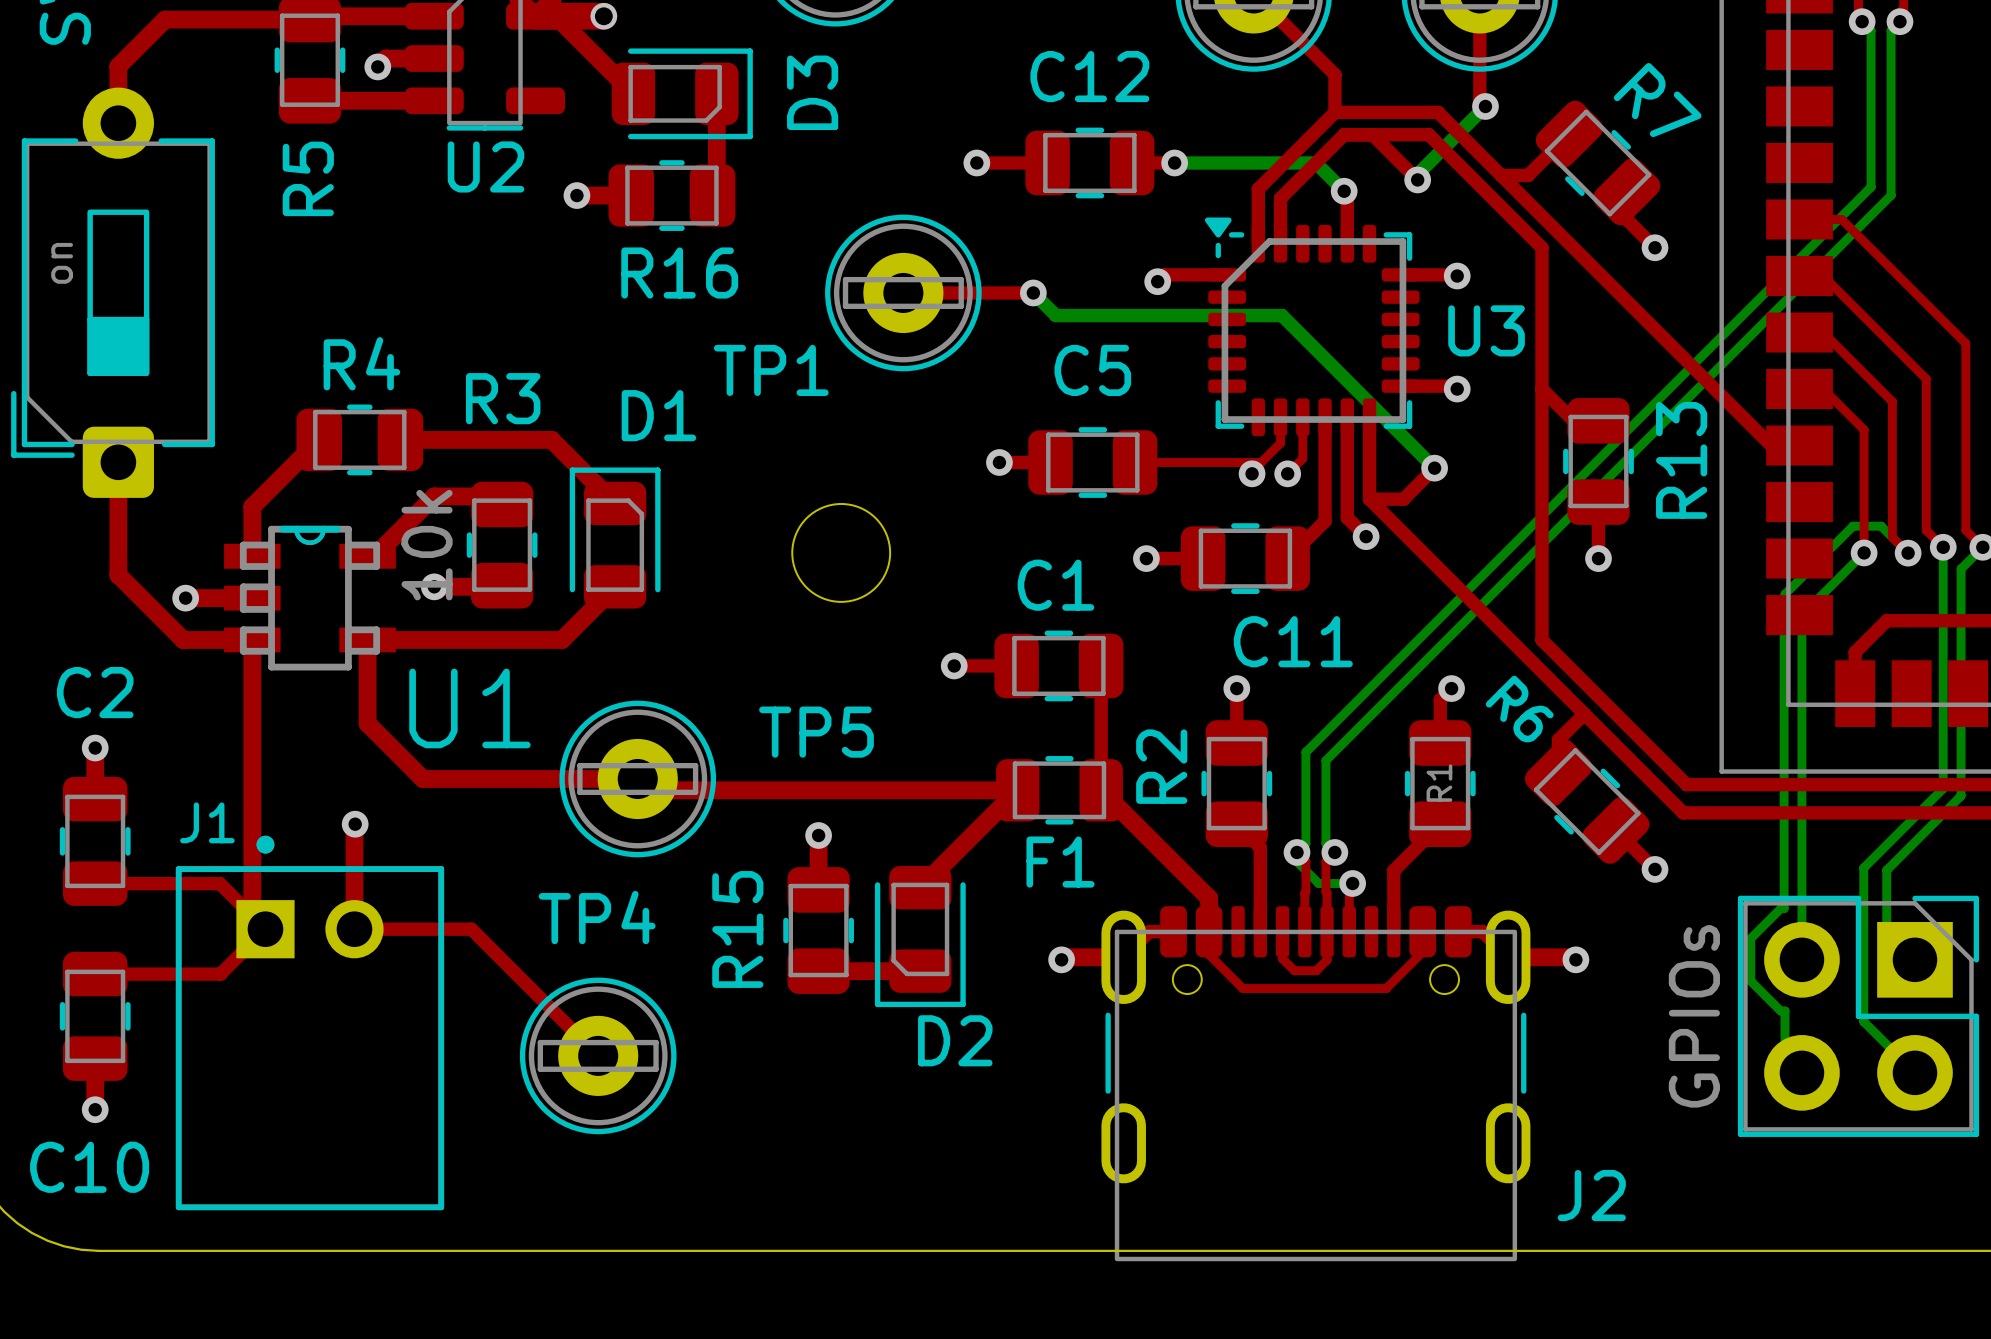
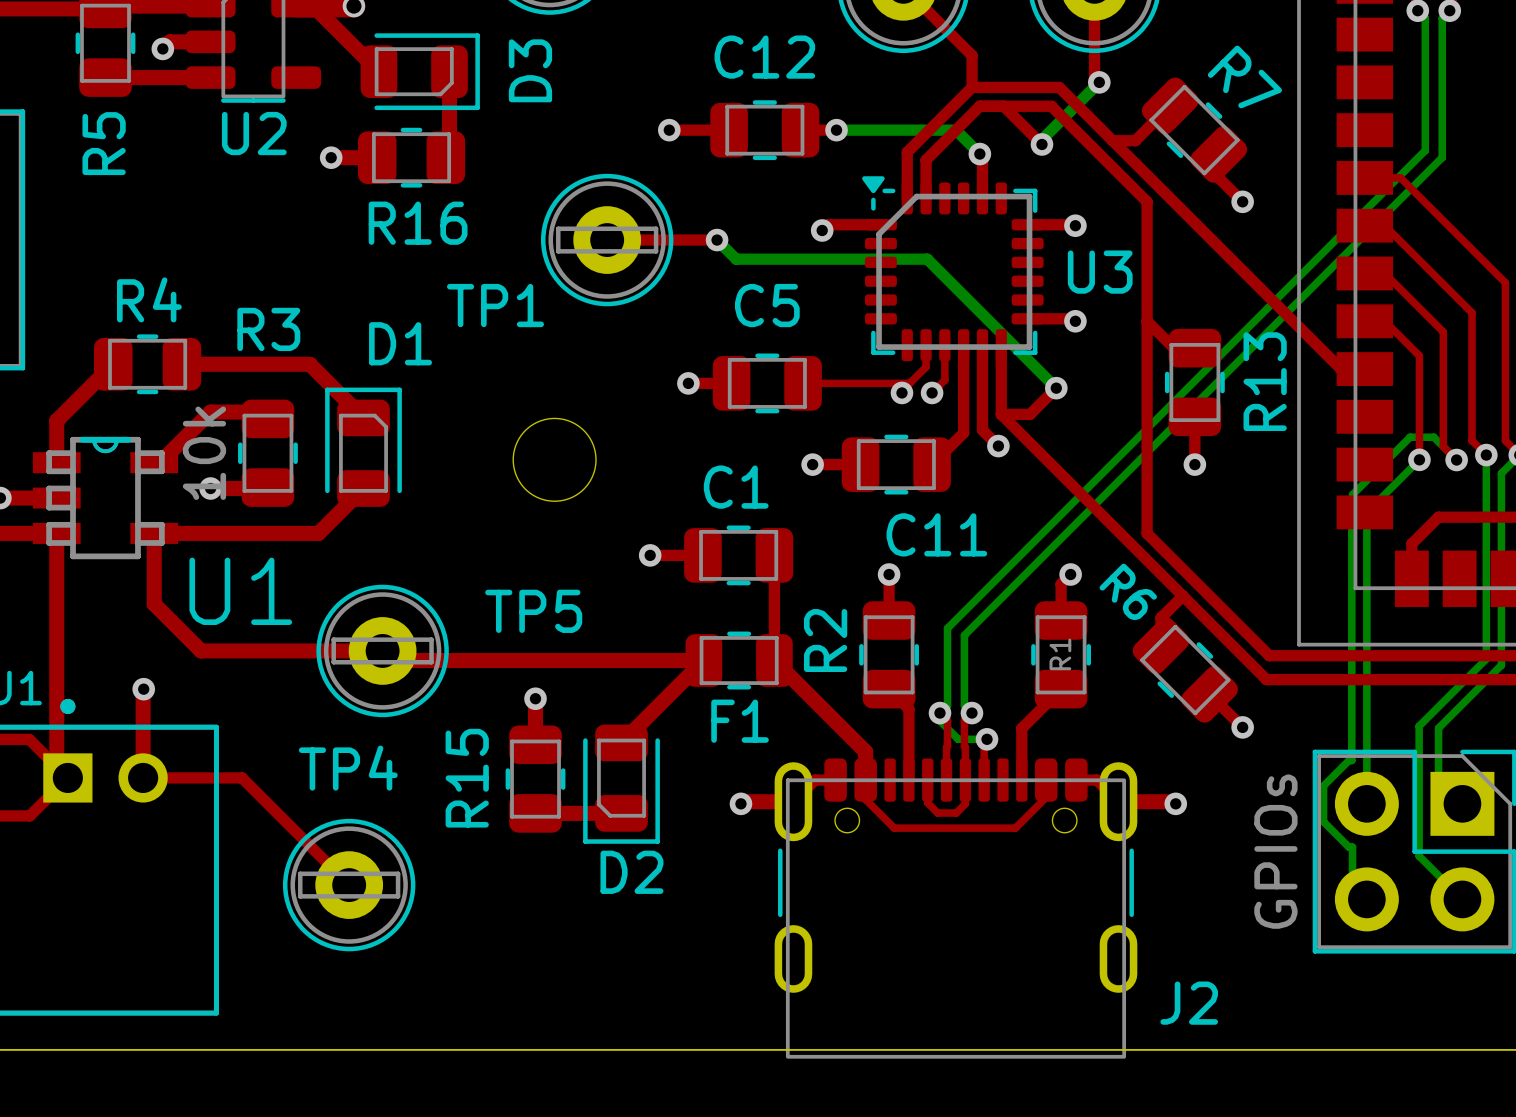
D2 name position: D2 (955, 1040) -> D2 (631, 872)

